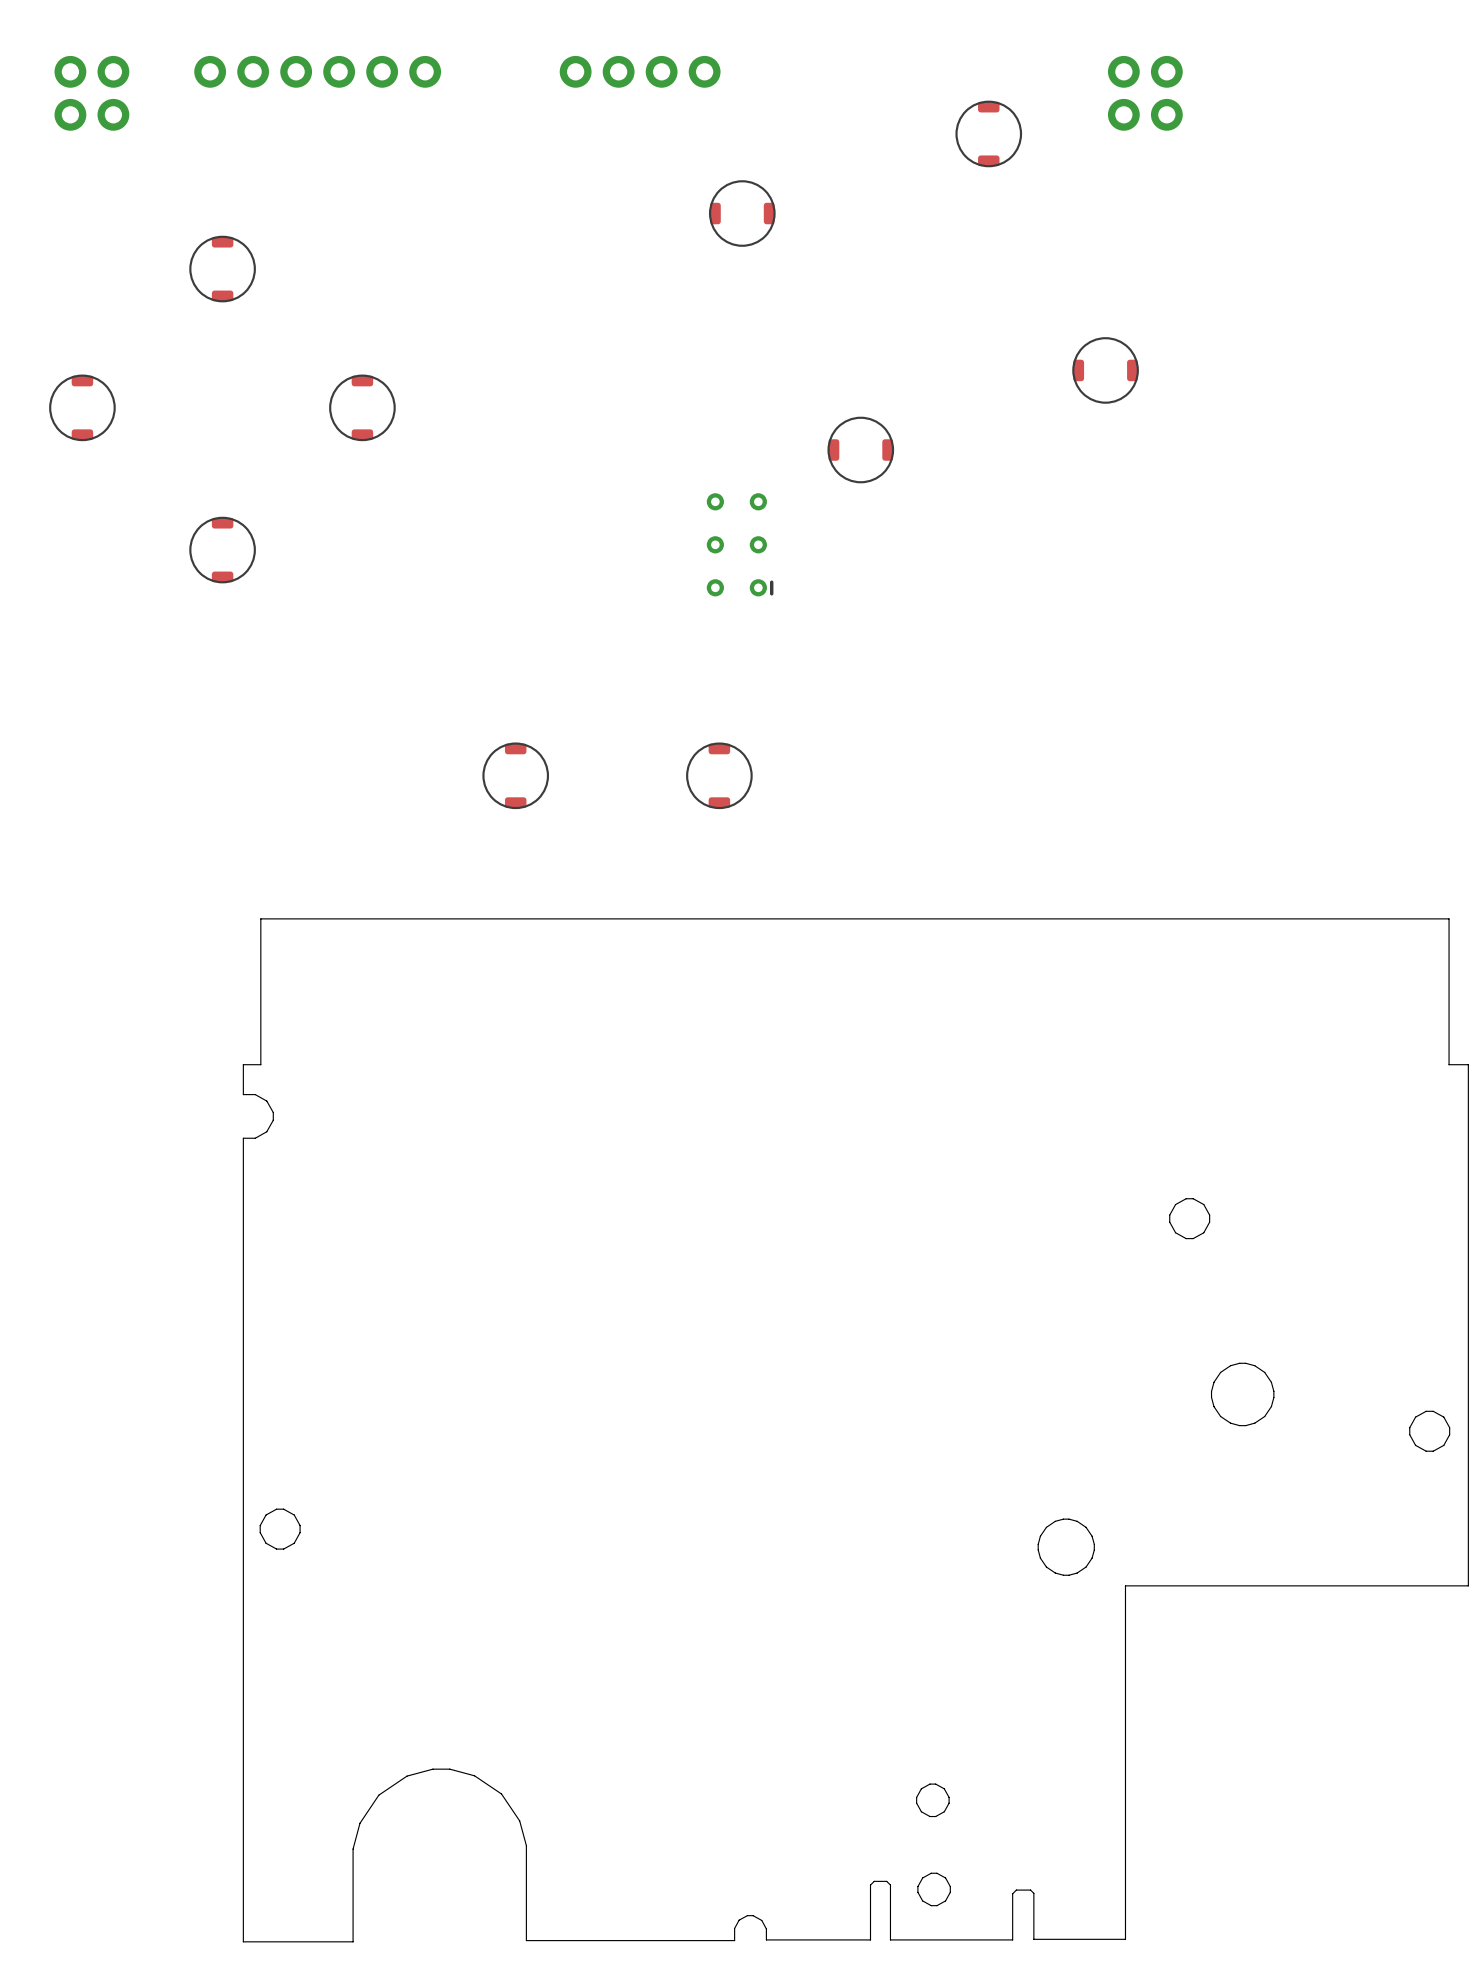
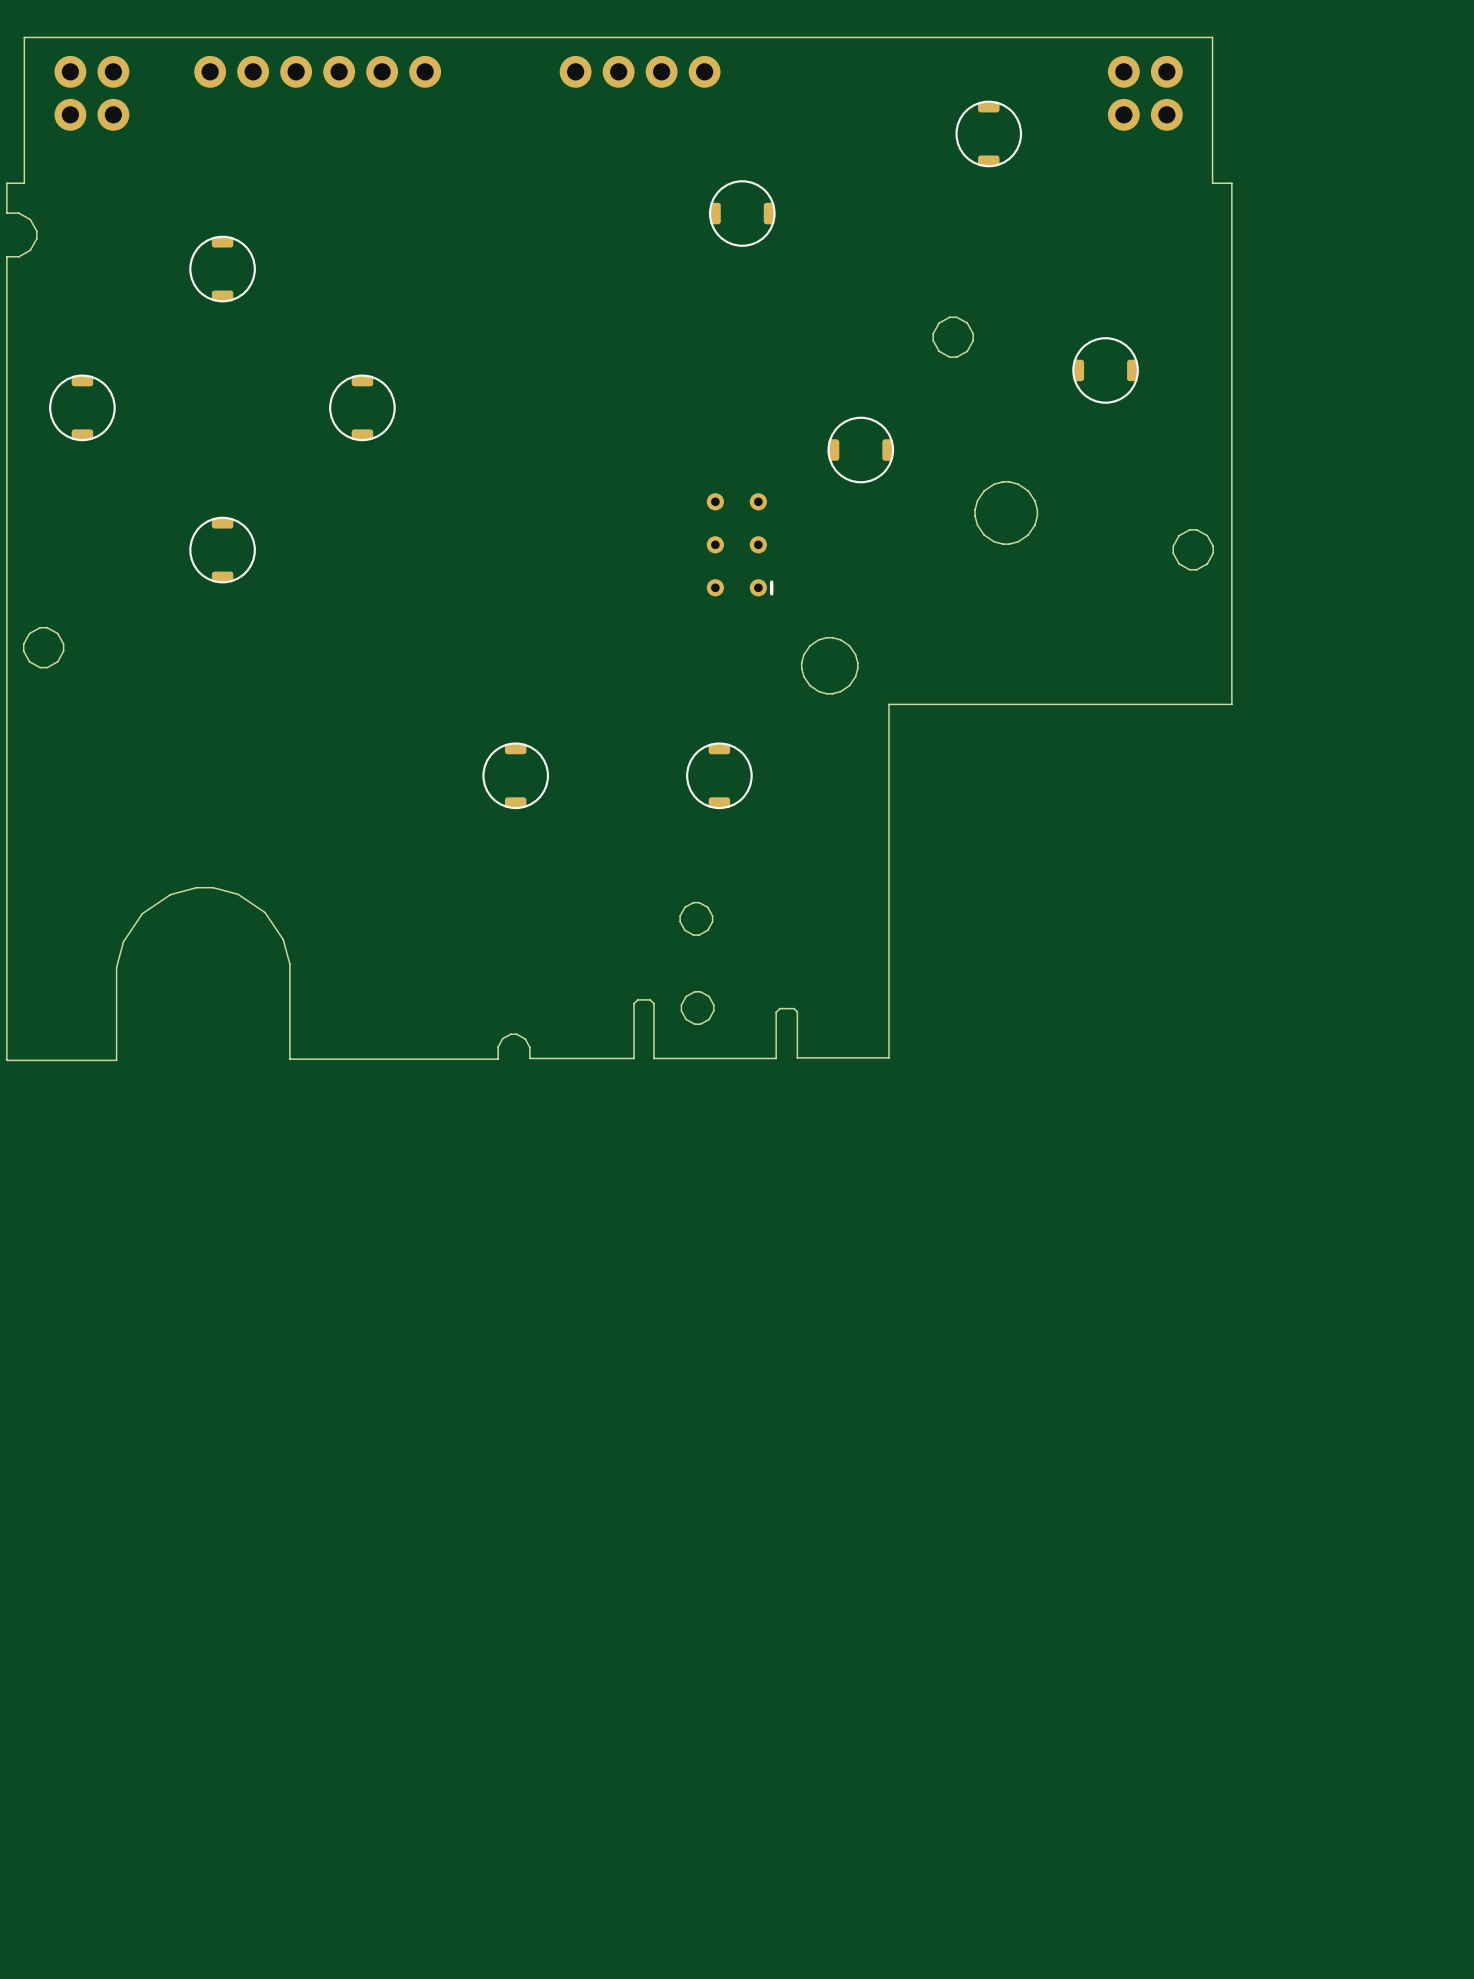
board edge: none -> (24, 37) (24, 183) (6, 183) (6, 213) (18, 213) (30, 219) (36, 231) (36, 238) (30, 250) (18, 256) (6, 256) (6, 1060) (116, 1060) (116, 967) (123, 941) (142, 913) (170, 894) (196, 887) (213, 887) (238, 894) (265, 912) (283, 939) (289, 964) (289, 1059) (498, 1059) (498, 1046) (502, 1038) (510, 1034) (516, 1034) (525, 1039) (529, 1047) (529, 1058) (634, 1058) (634, 1003) (637, 999) (650, 999) (653, 1003) (653, 1058) (776, 1058) (776, 1012) (779, 1008) (794, 1008) (797, 1011) (797, 1057) (888, 1057) (888, 704) (1231, 704) (1231, 183) (1212, 183) (1212, 37) (24, 37)
board edge: none -> (949, 317) (939, 323) (933, 333) (933, 340) (939, 351) (949, 357) (956, 357) (967, 351) (973, 340) (973, 333) (967, 323) (956, 317) (949, 317)
board edge: none -> (1003, 481) (994, 484) (984, 490) (977, 500) (975, 516) (977, 525) (984, 535) (994, 541) (1009, 544) (1018, 541) (1028, 535) (1034, 525) (1037, 509) (1034, 500) (1028, 490) (1018, 484) (1003, 481)
board edge: none -> (1189, 529) (1179, 535) (1173, 546) (1173, 553) (1179, 563) (1189, 569) (1196, 569) (1207, 563) (1213, 553) (1213, 546) (1207, 535) (1196, 529) (1189, 529)
board edge: none -> (40, 627) (29, 633) (23, 644) (23, 651) (29, 661) (40, 667) (47, 667) (57, 661) (63, 651) (63, 644) (57, 633) (47, 627) (40, 627)
board edge: none -> (827, 637) (818, 639) (809, 645) (803, 654) (801, 668) (803, 676) (809, 685) (818, 691) (832, 693) (840, 691) (849, 685) (855, 676) (857, 662) (855, 654) (849, 645) (840, 639) (827, 637)
board edge: none -> (693, 902) (684, 907) (680, 915) (680, 921) (684, 930) (693, 935) (699, 935) (707, 930) (712, 921) (712, 915) (707, 907) (699, 902) (693, 902)
board edge: (260, 918) (260, 1064) (243, 1064) (243, 1094) (255, 1094) (266, 1101) (273, 1112) (273, 1120) (266, 1131) (255, 1138) (243, 1138) (243, 1941) (353, 1941) (353, 1849) (359, 1823) (378, 1795) (406, 1776) (432, 1769) (449, 1769) (474, 1775) (501, 1793) (519, 1820) (526, 1845) (526, 1940) (734, 1940) (734, 1928) (739, 1920) (747, 1915) (753, 1915) (761, 1920) (766, 1929) (766, 1939) (870, 1939) (870, 1885) (874, 1881) (886, 1881) (890, 1885) (890, 1939) (1012, 1939) (1012, 1893) (1016, 1890) (1030, 1890) (1033, 1893) (1033, 1939) (1125, 1939) (1125, 1585) (1468, 1585) (1468, 1064) (1449, 1064) (1449, 918) (260, 918) -> none
board edge: none -> (694, 991) (686, 996) (681, 1005) (681, 1010) (686, 1019) (694, 1024) (700, 1024) (709, 1019) (713, 1010) (713, 1005) (709, 996) (700, 991) (694, 991)
board edge: (1186, 1198) (1175, 1204) (1169, 1215) (1169, 1222) (1175, 1232) (1186, 1238) (1193, 1238) (1203, 1232) (1209, 1222) (1209, 1215) (1203, 1204) (1193, 1198) (1186, 1198) -> none
board edge: (1239, 1363) (1230, 1365) (1220, 1372) (1213, 1382) (1211, 1397) (1213, 1406) (1220, 1416) (1230, 1423) (1245, 1425) (1254, 1423) (1264, 1416) (1271, 1406) (1273, 1391) (1271, 1382) (1264, 1372) (1254, 1365) (1239, 1363) -> none
board edge: (1426, 1411) (1415, 1417) (1409, 1427) (1409, 1434) (1415, 1445) (1426, 1451) (1433, 1451) (1443, 1445) (1449, 1434) (1449, 1427) (1443, 1417) (1433, 1411) (1426, 1411) -> none
board edge: (276, 1509) (266, 1515) (260, 1525) (260, 1532) (266, 1543) (276, 1549) (283, 1549) (294, 1543) (300, 1532) (300, 1525) (294, 1515) (283, 1509) (276, 1509) -> none
board edge: (1063, 1519) (1055, 1521) (1046, 1527) (1040, 1536) (1038, 1549) (1040, 1558) (1046, 1567) (1055, 1573) (1068, 1575) (1077, 1573) (1086, 1567) (1092, 1558) (1094, 1544) (1092, 1536) (1086, 1527) (1077, 1521) (1063, 1519) -> none
board edge: (929, 1784) (921, 1788) (916, 1797) (916, 1803) (921, 1811) (929, 1816) (935, 1816) (944, 1811) (949, 1803) (949, 1797) (944, 1788) (935, 1784) (929, 1784) -> none
board edge: (931, 1873) (922, 1877) (917, 1886) (917, 1892) (922, 1900) (931, 1905) (936, 1905) (945, 1900) (950, 1892) (950, 1886) (945, 1877) (936, 1873) (931, 1873) -> none

